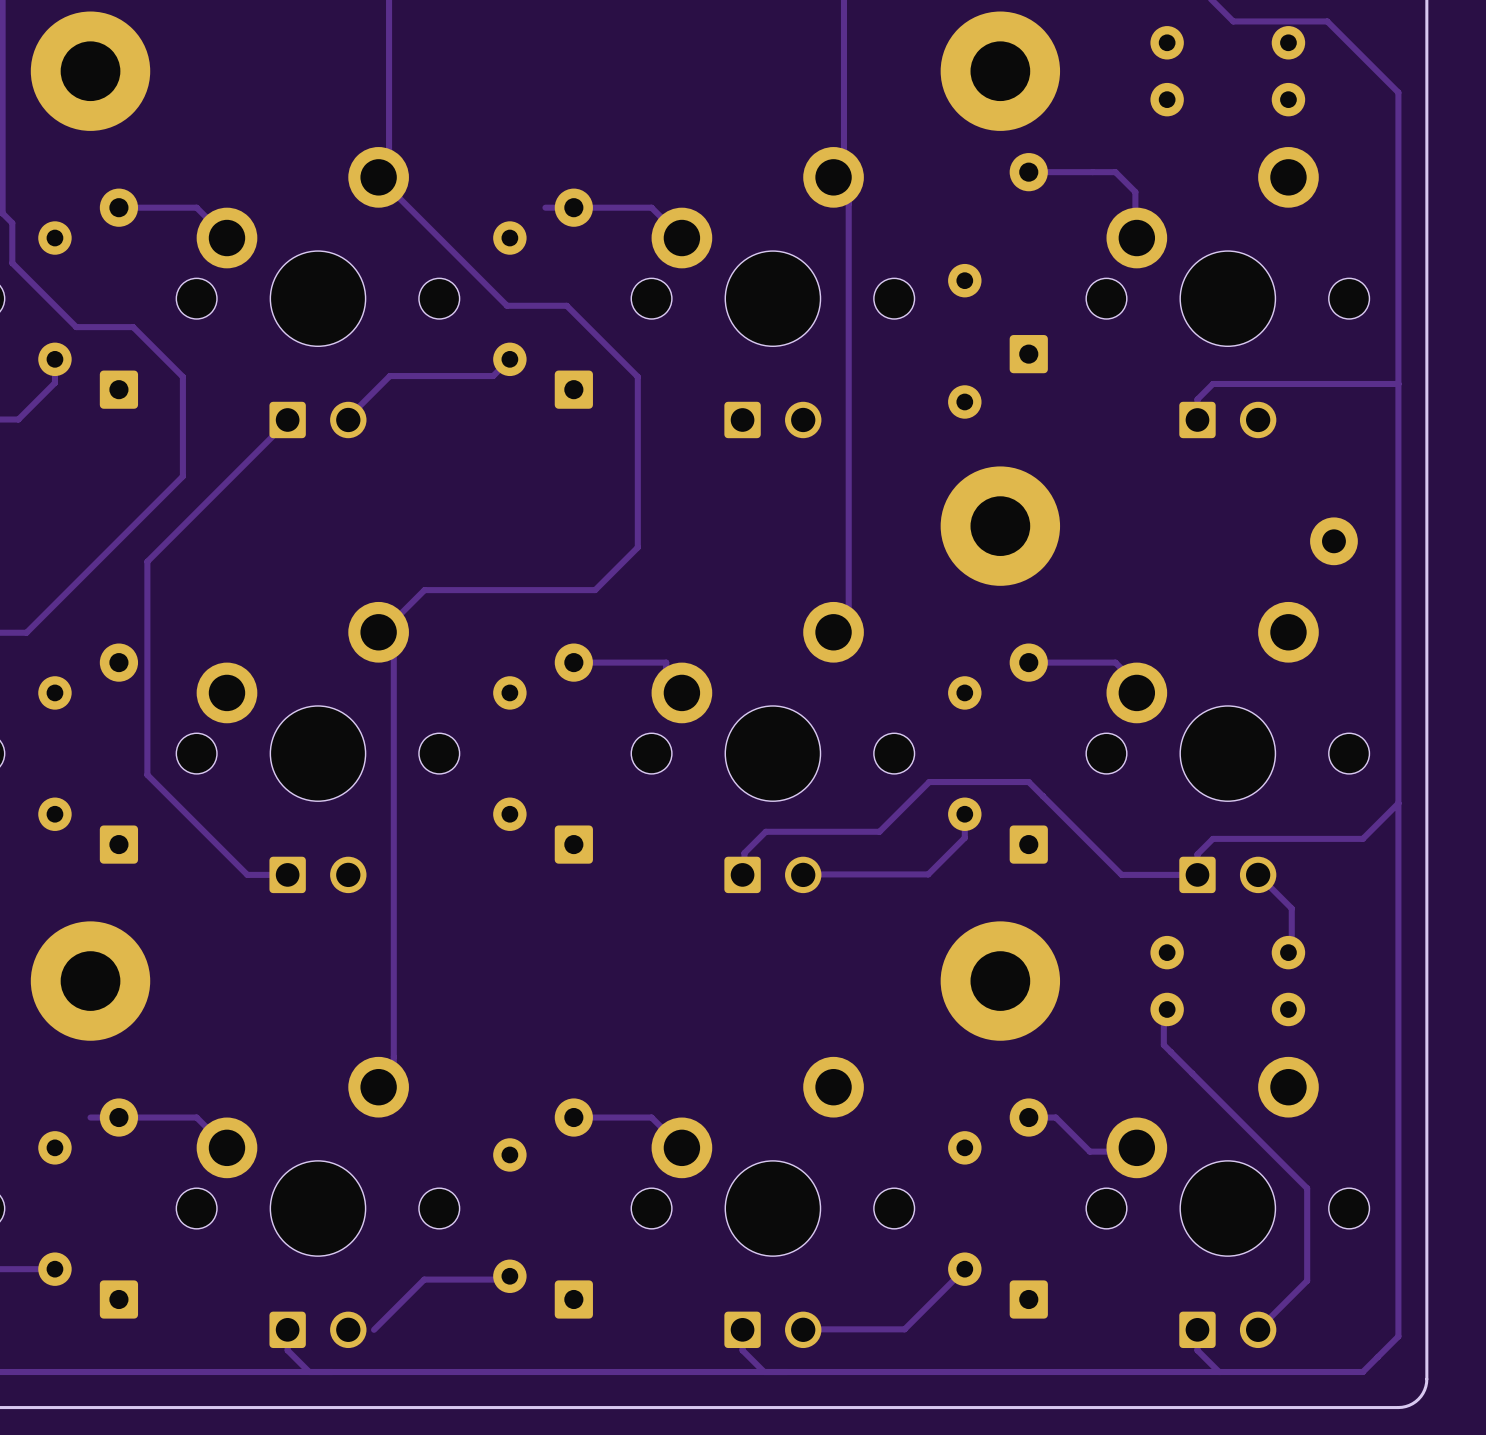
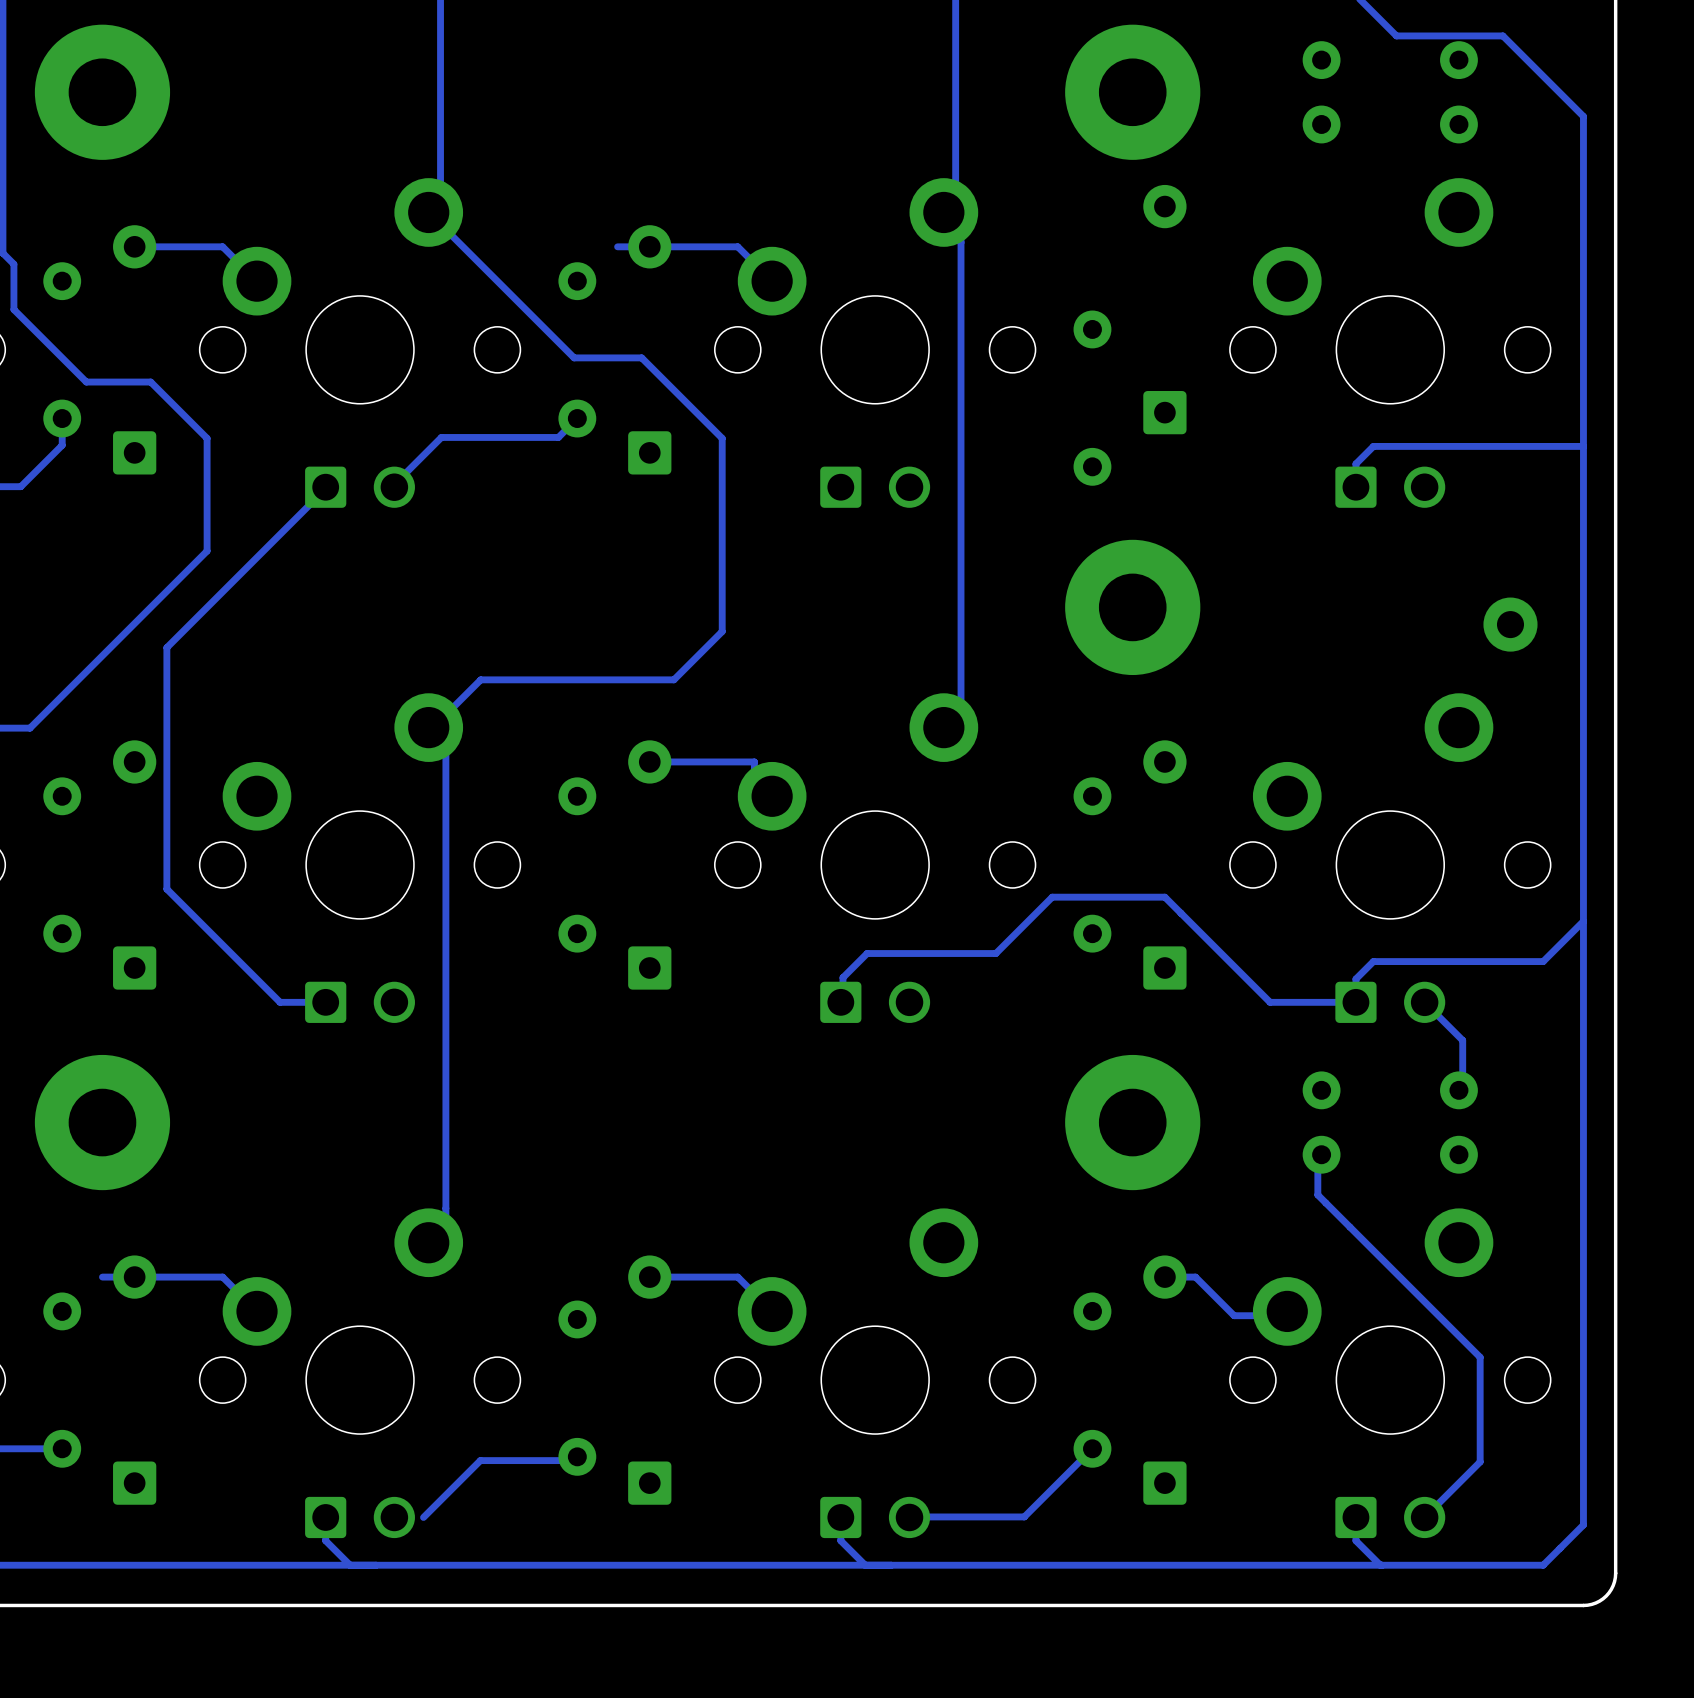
track: (1028, 172) (1115, 172) (1135, 192) (1135, 234) -> none
track: (1028, 662) (1115, 662) (1142, 689) -> none
track: (964, 814) (964, 837) (928, 874) (801, 874) -> none

